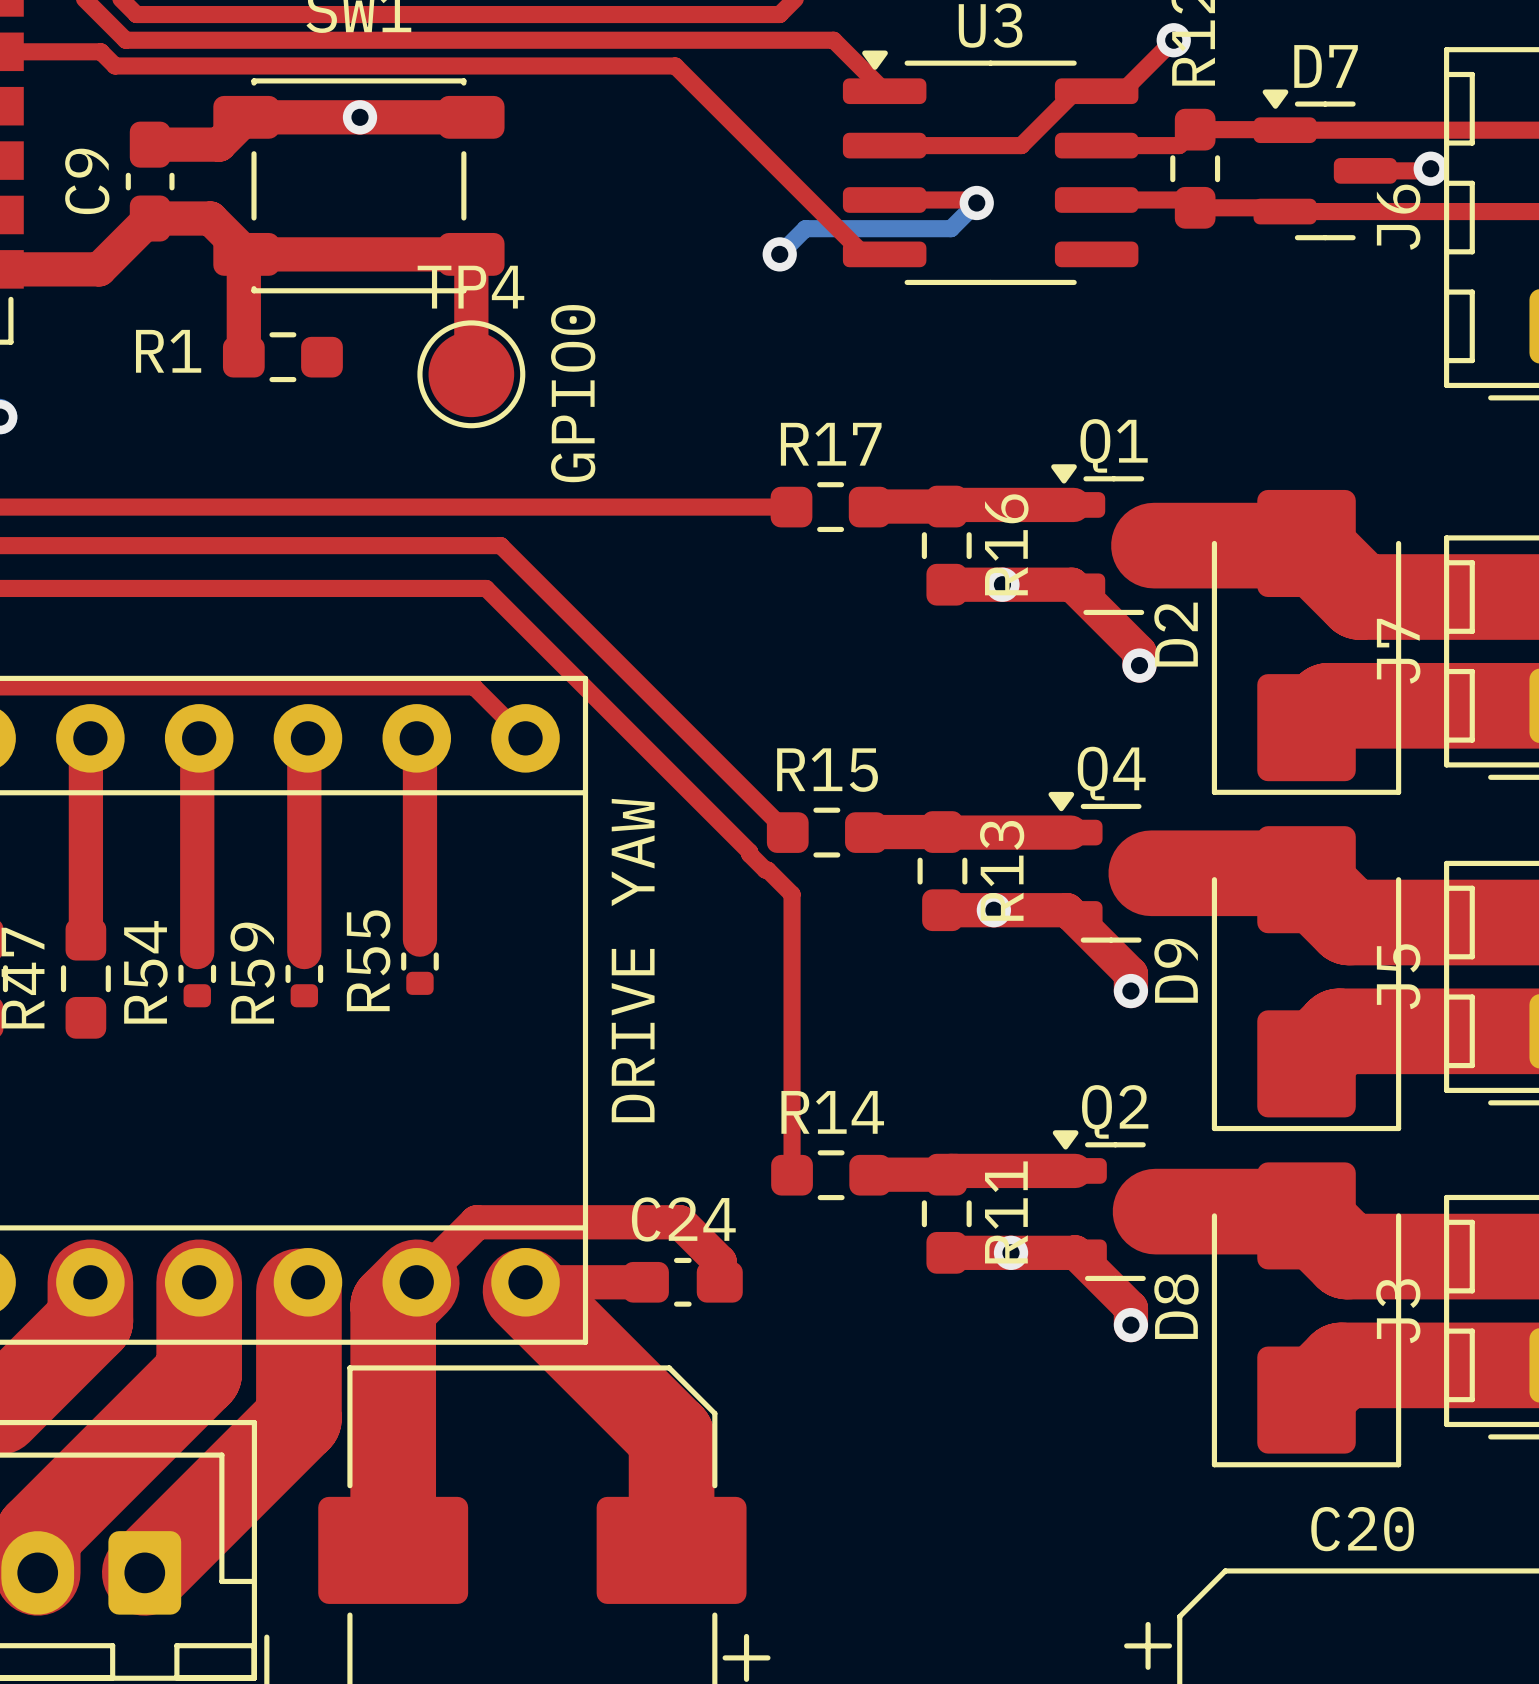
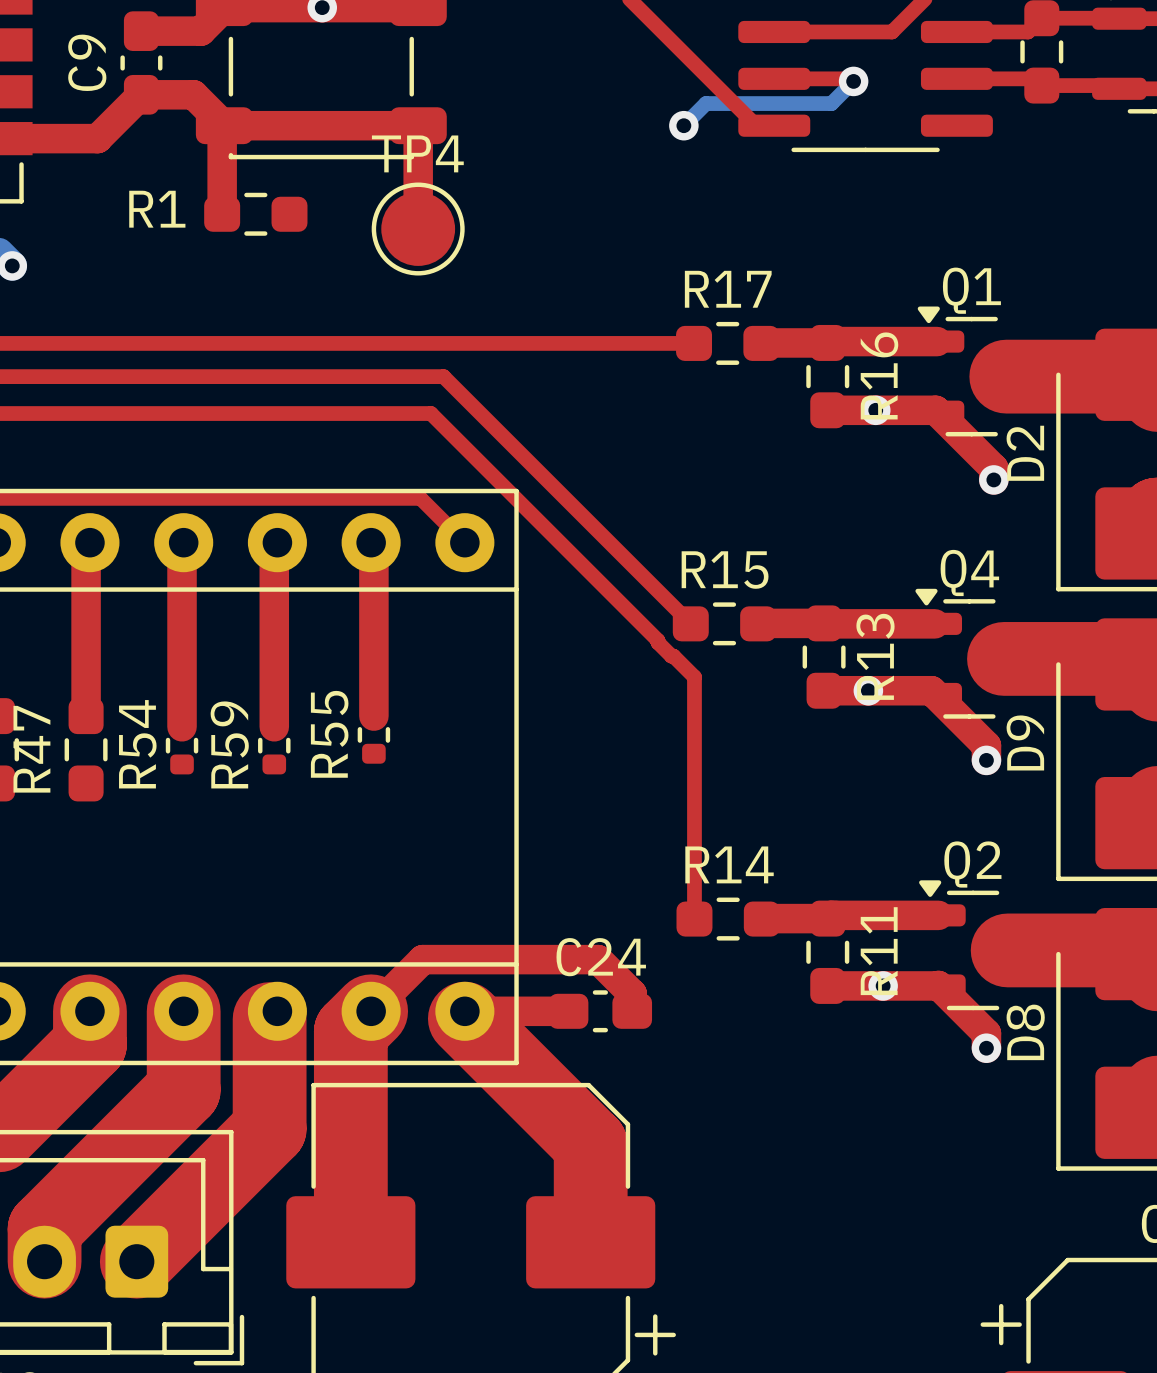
text: GPIO0 (573, 393) -> none
text: DRIVE YAW (633, 960) -> none

